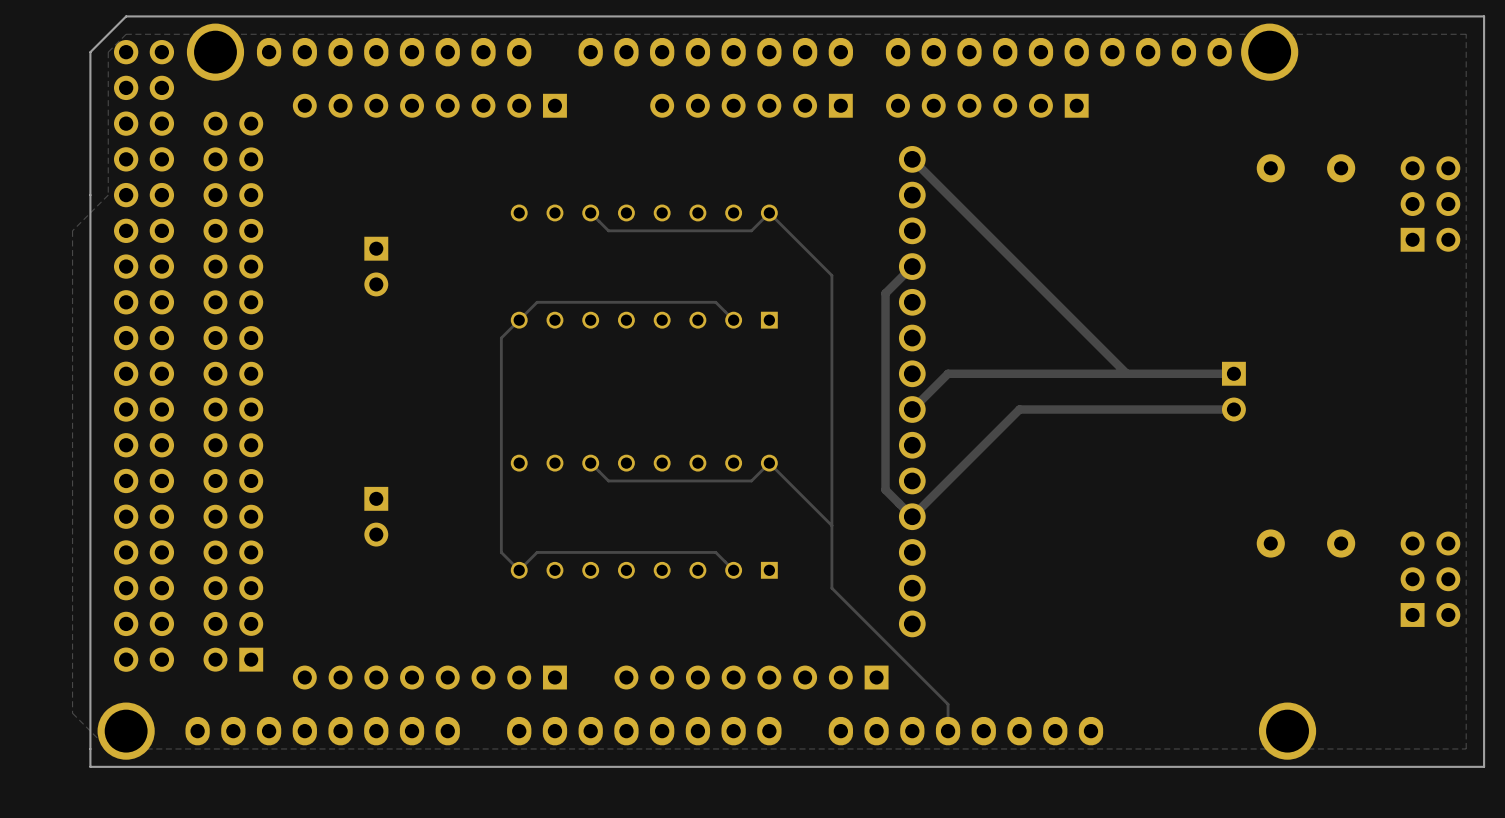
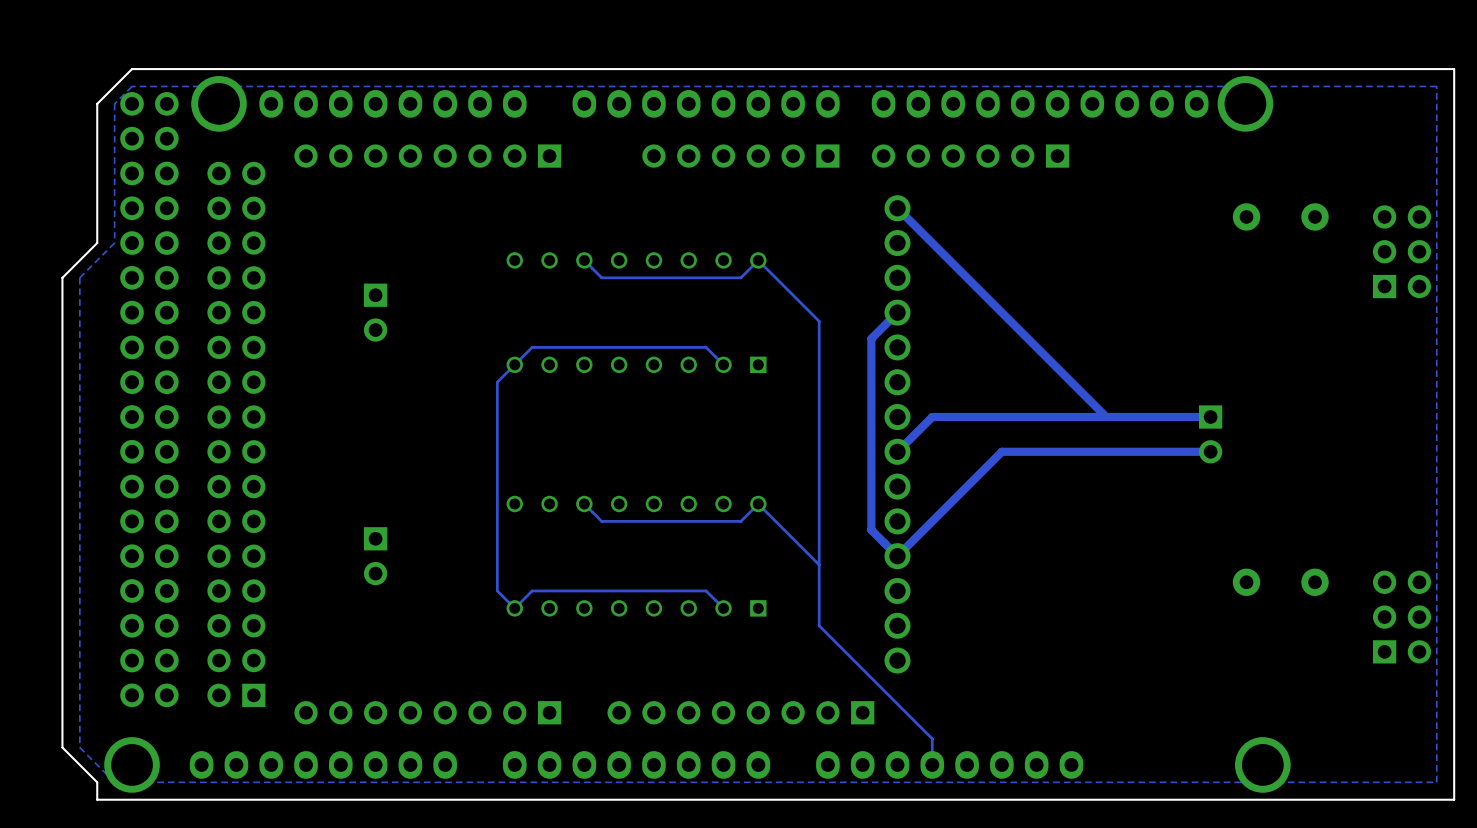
board edge: (90, 195) (90, 748) -> (97, 243) (62, 277) (62, 747) (97, 782)

